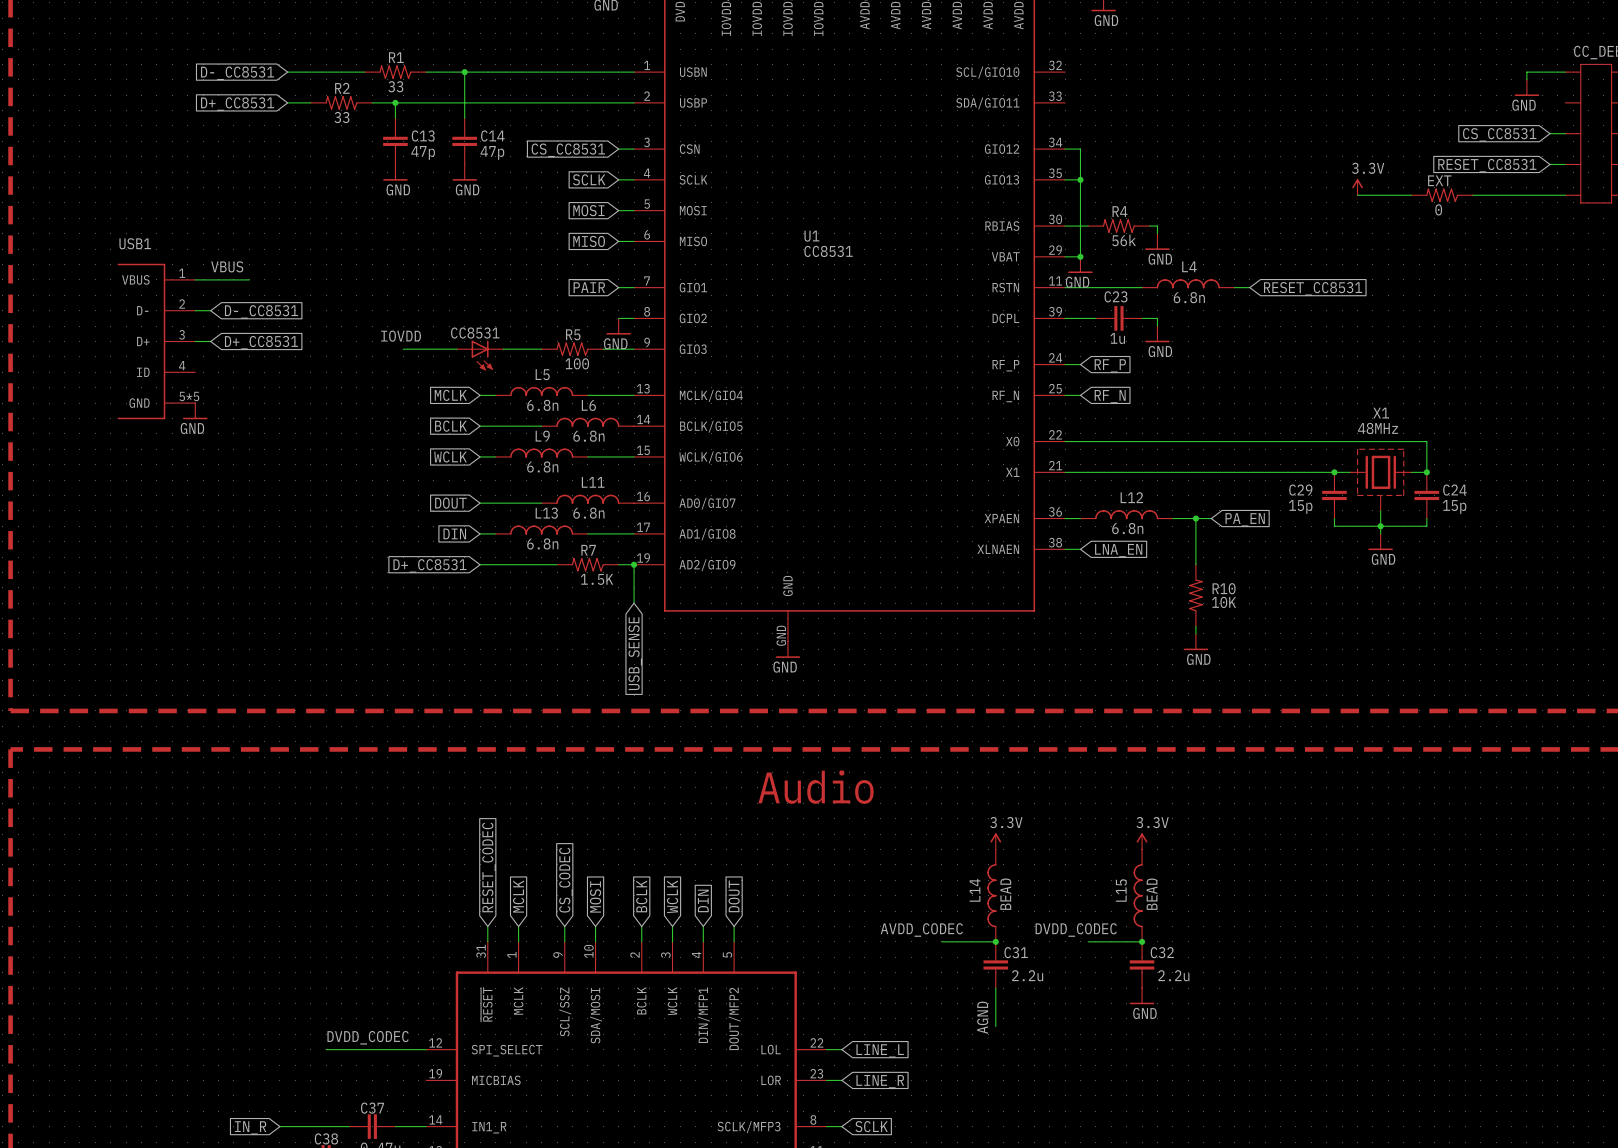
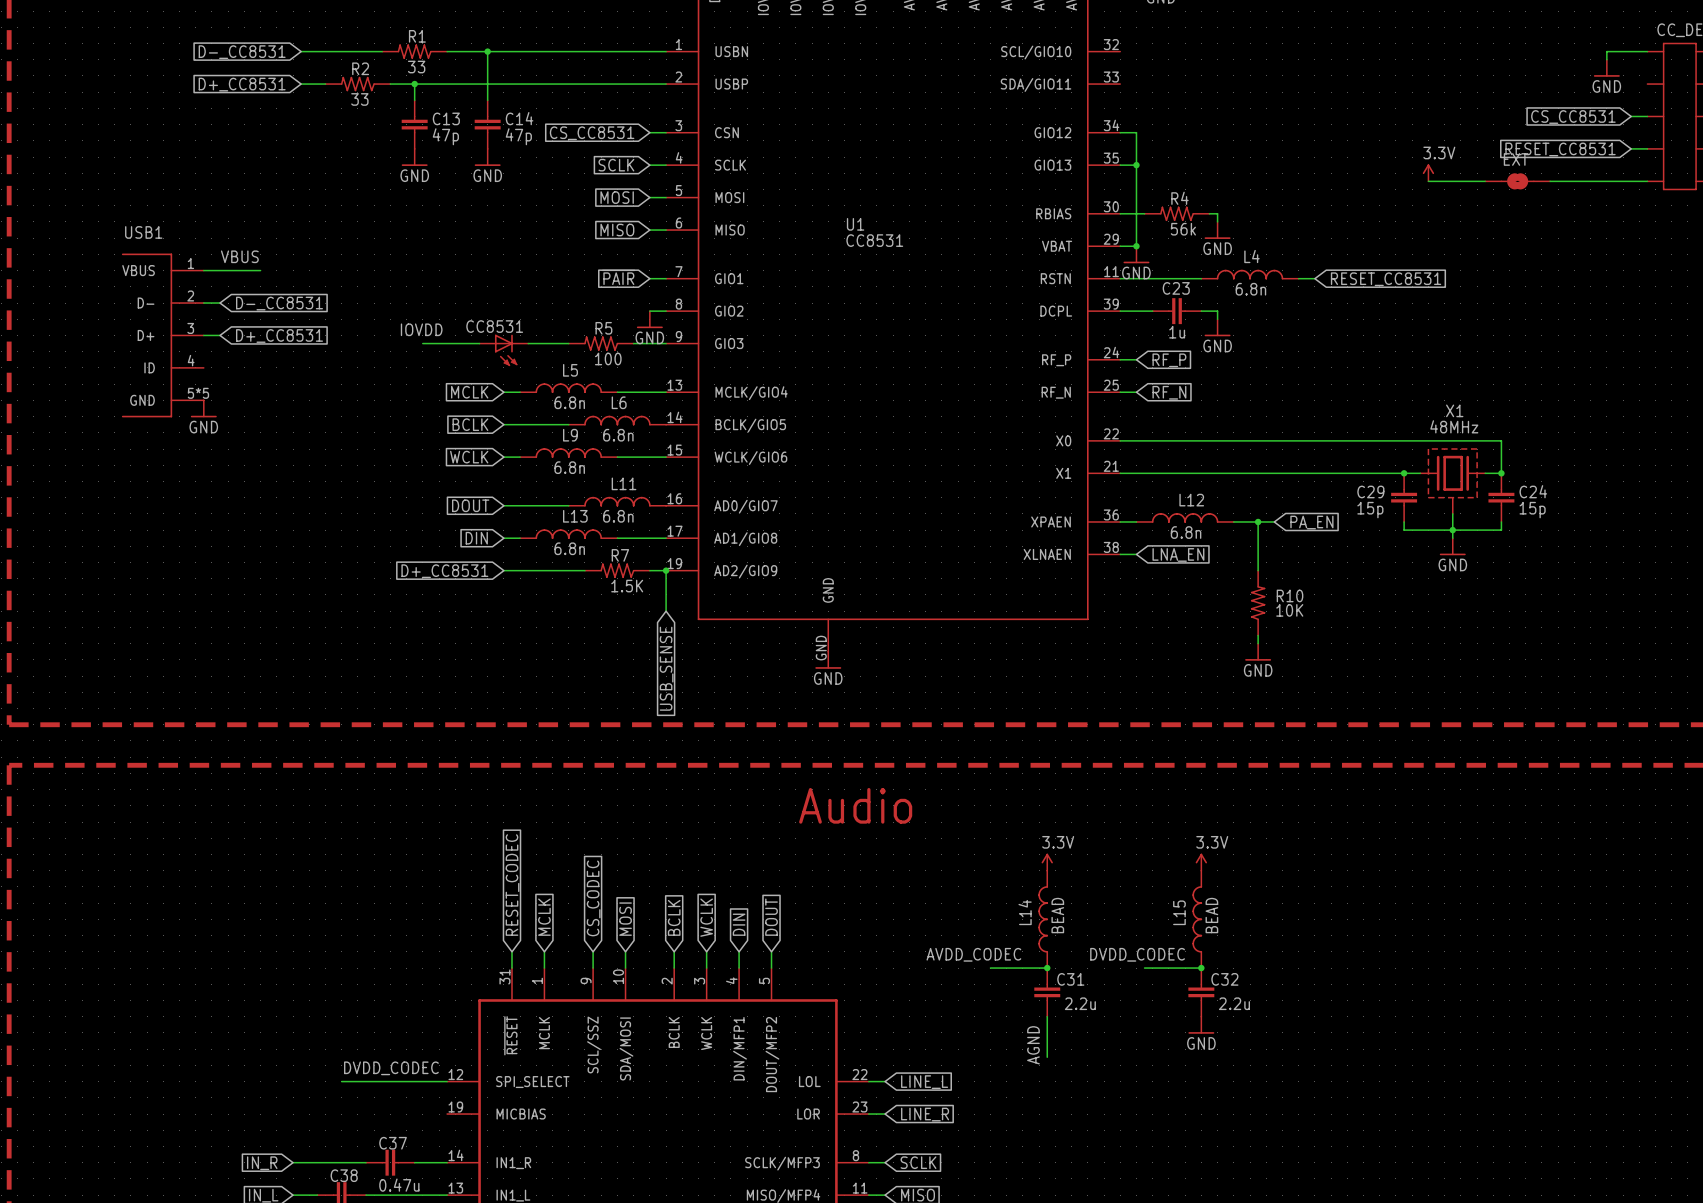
EXT symbol: [1411, 188, 1474, 203] -> [1485, 173, 1551, 190]
EXT value: 0 (1438, 209) -> none

